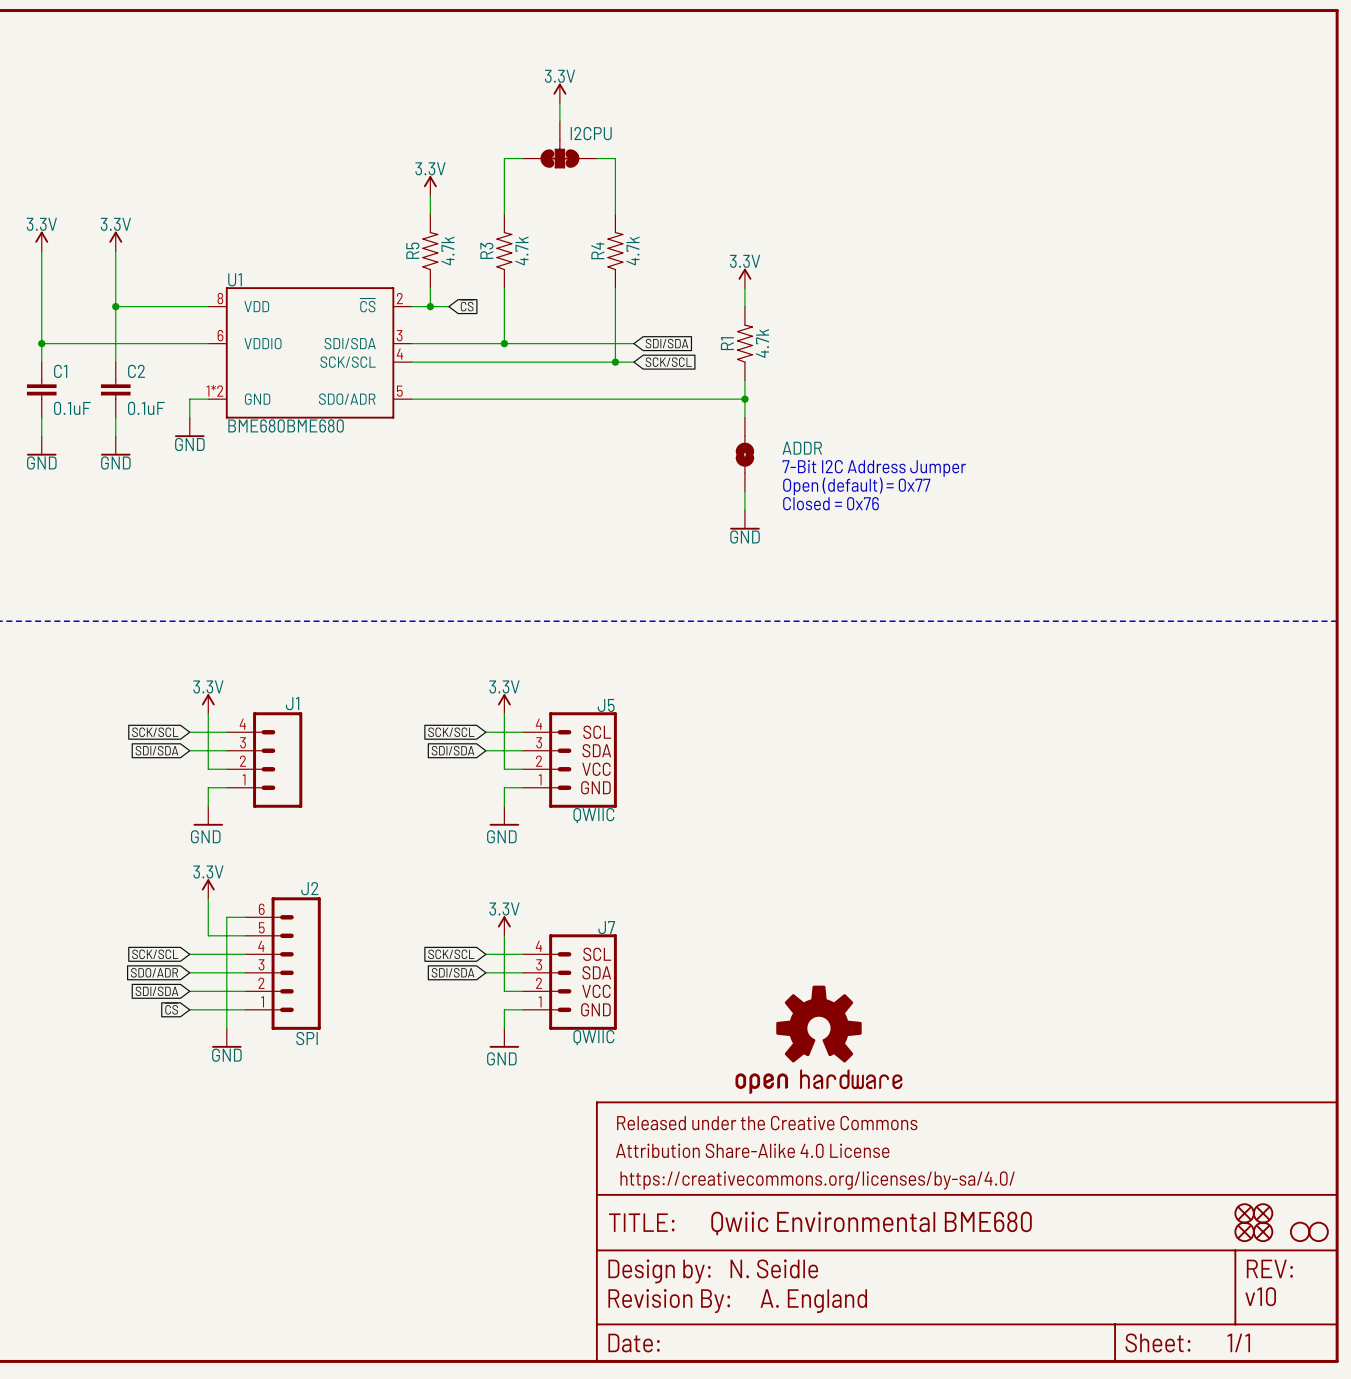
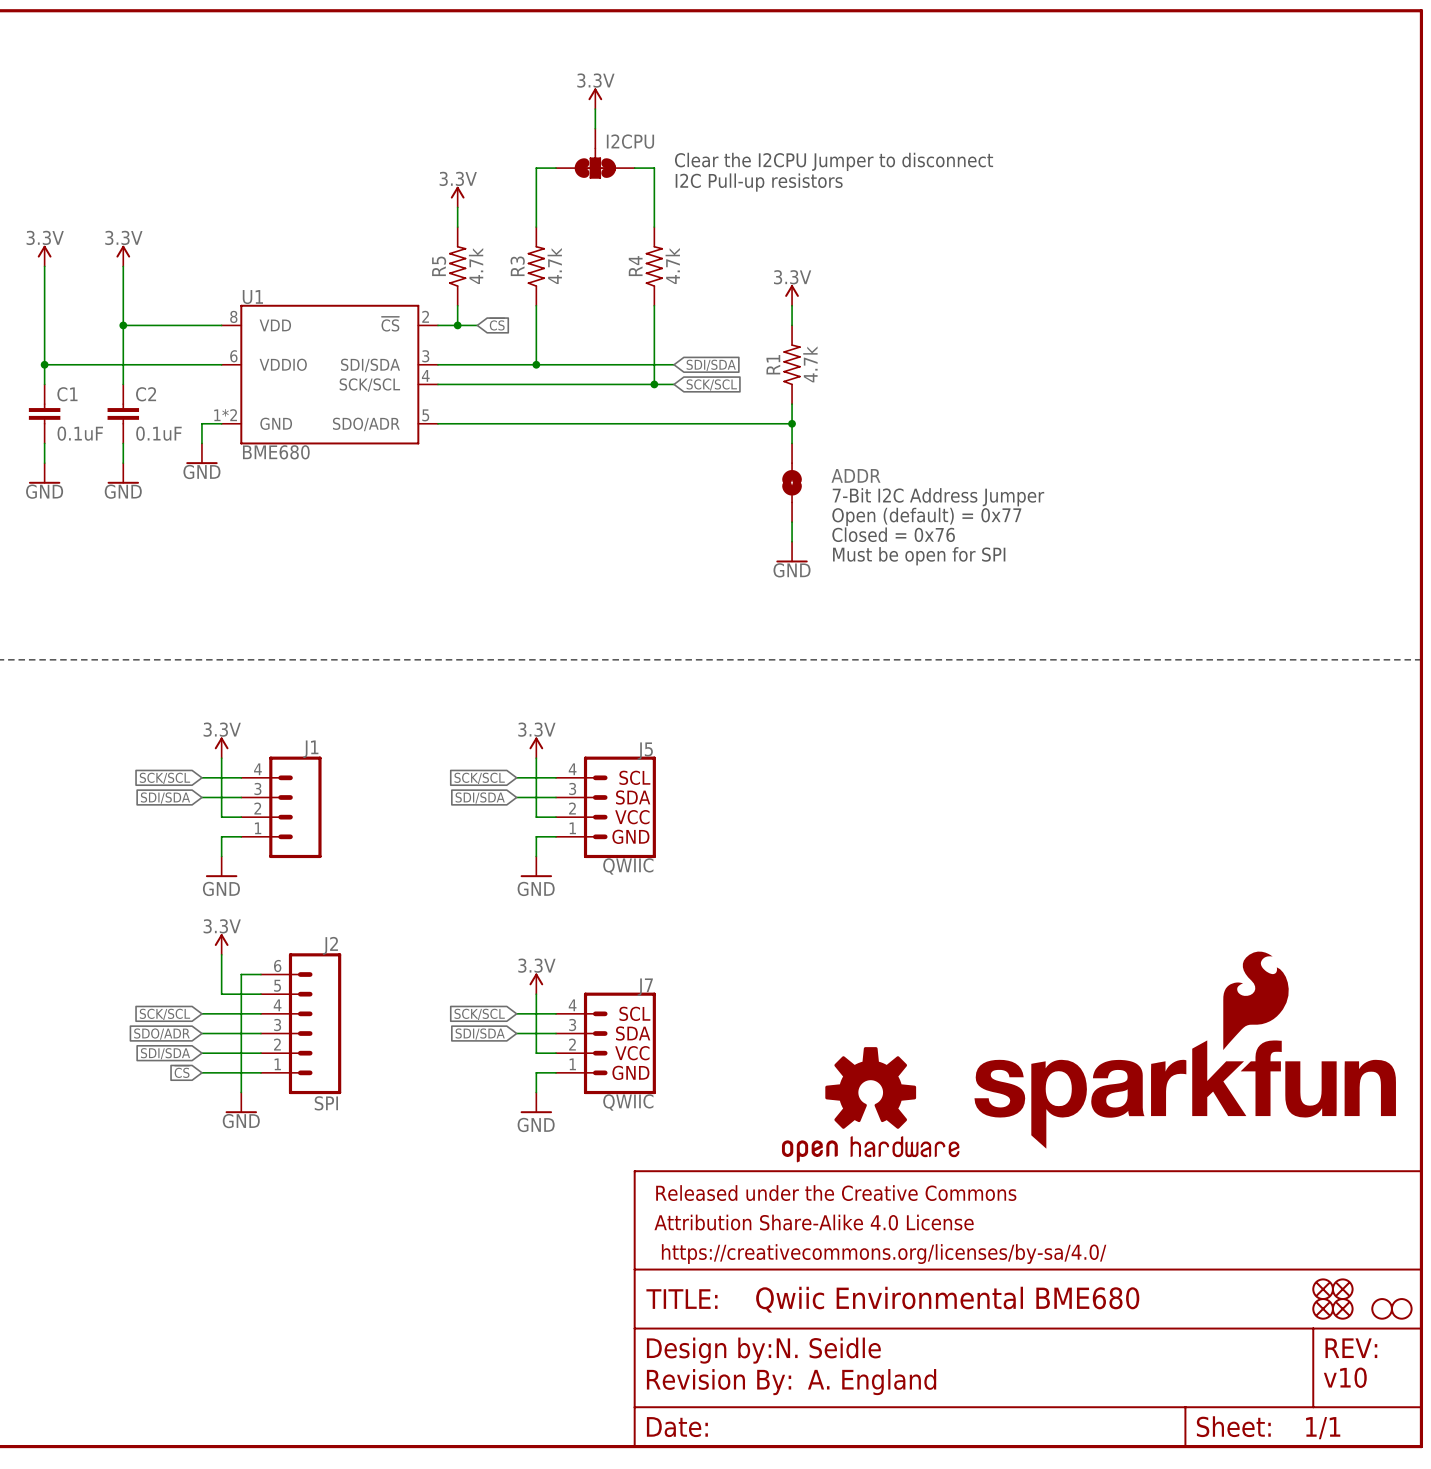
text: none -> Clear the I2CPU Jumper to disconnect (834, 161)
text: none -> I2C Pull-up resistors (759, 182)
U1 value: BME680BME680 (286, 425) -> BME680 (276, 452)
text: none -> Must be open for SPI (919, 556)
part: none -> (1185, 1050)

